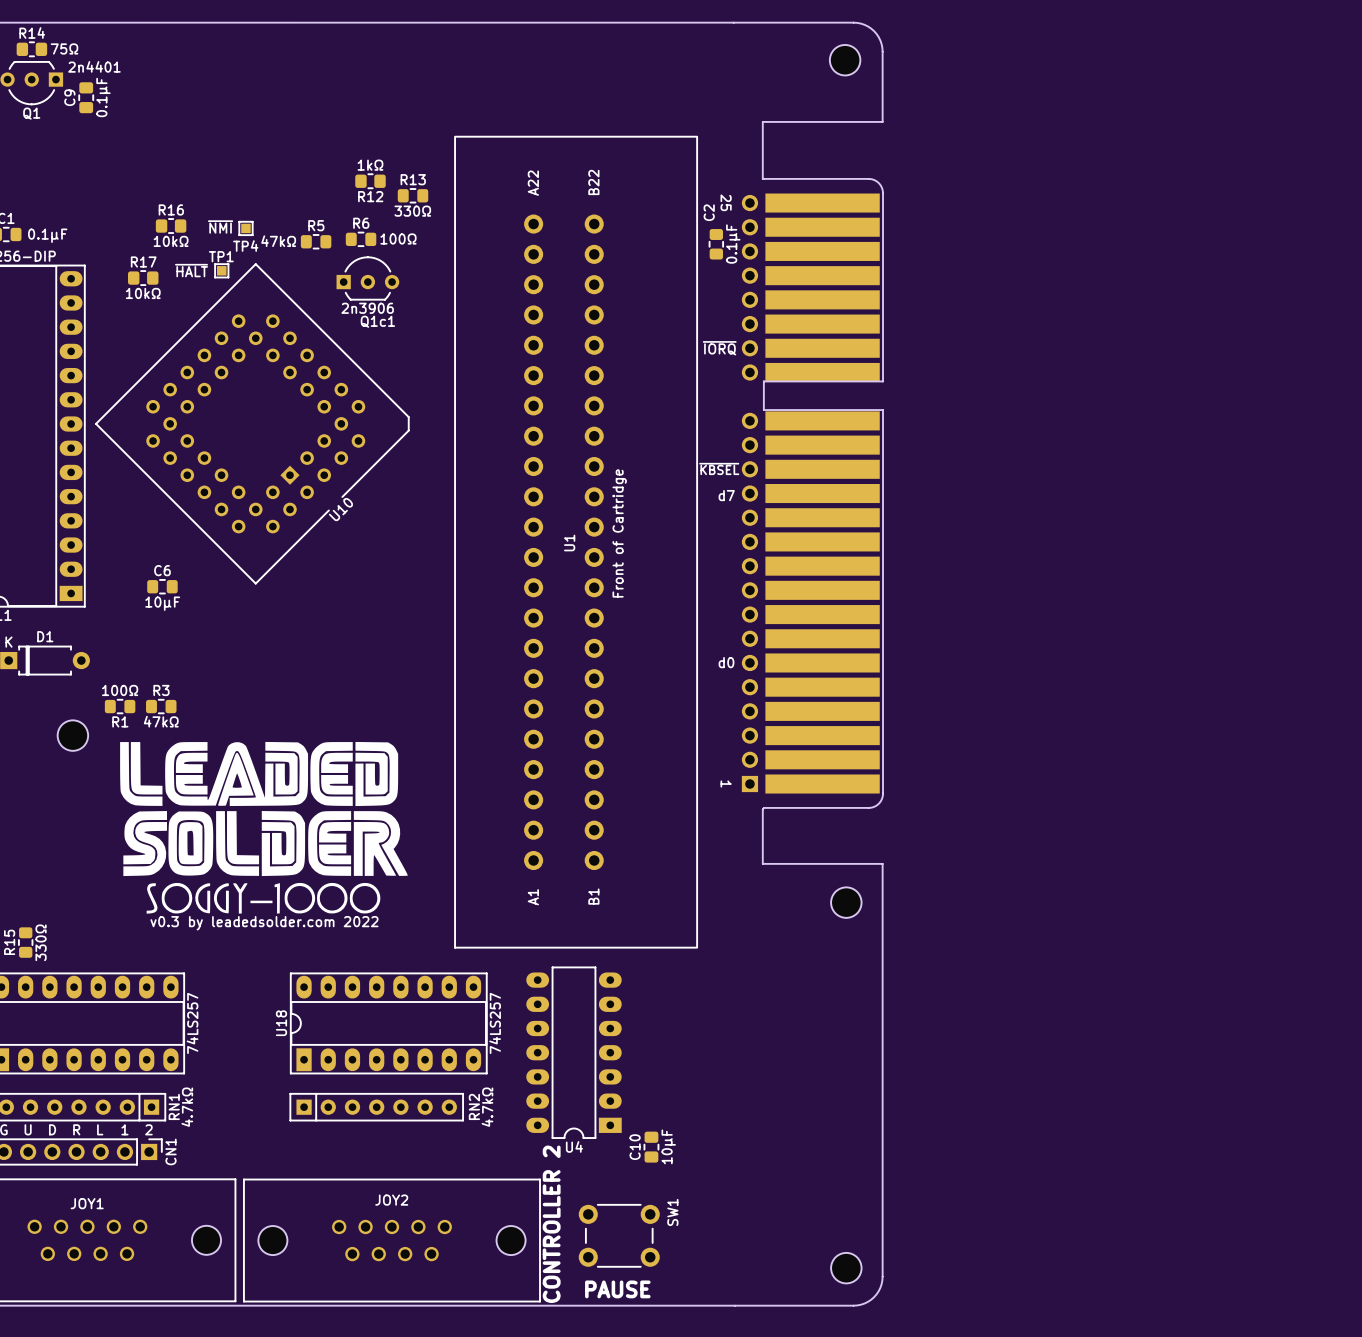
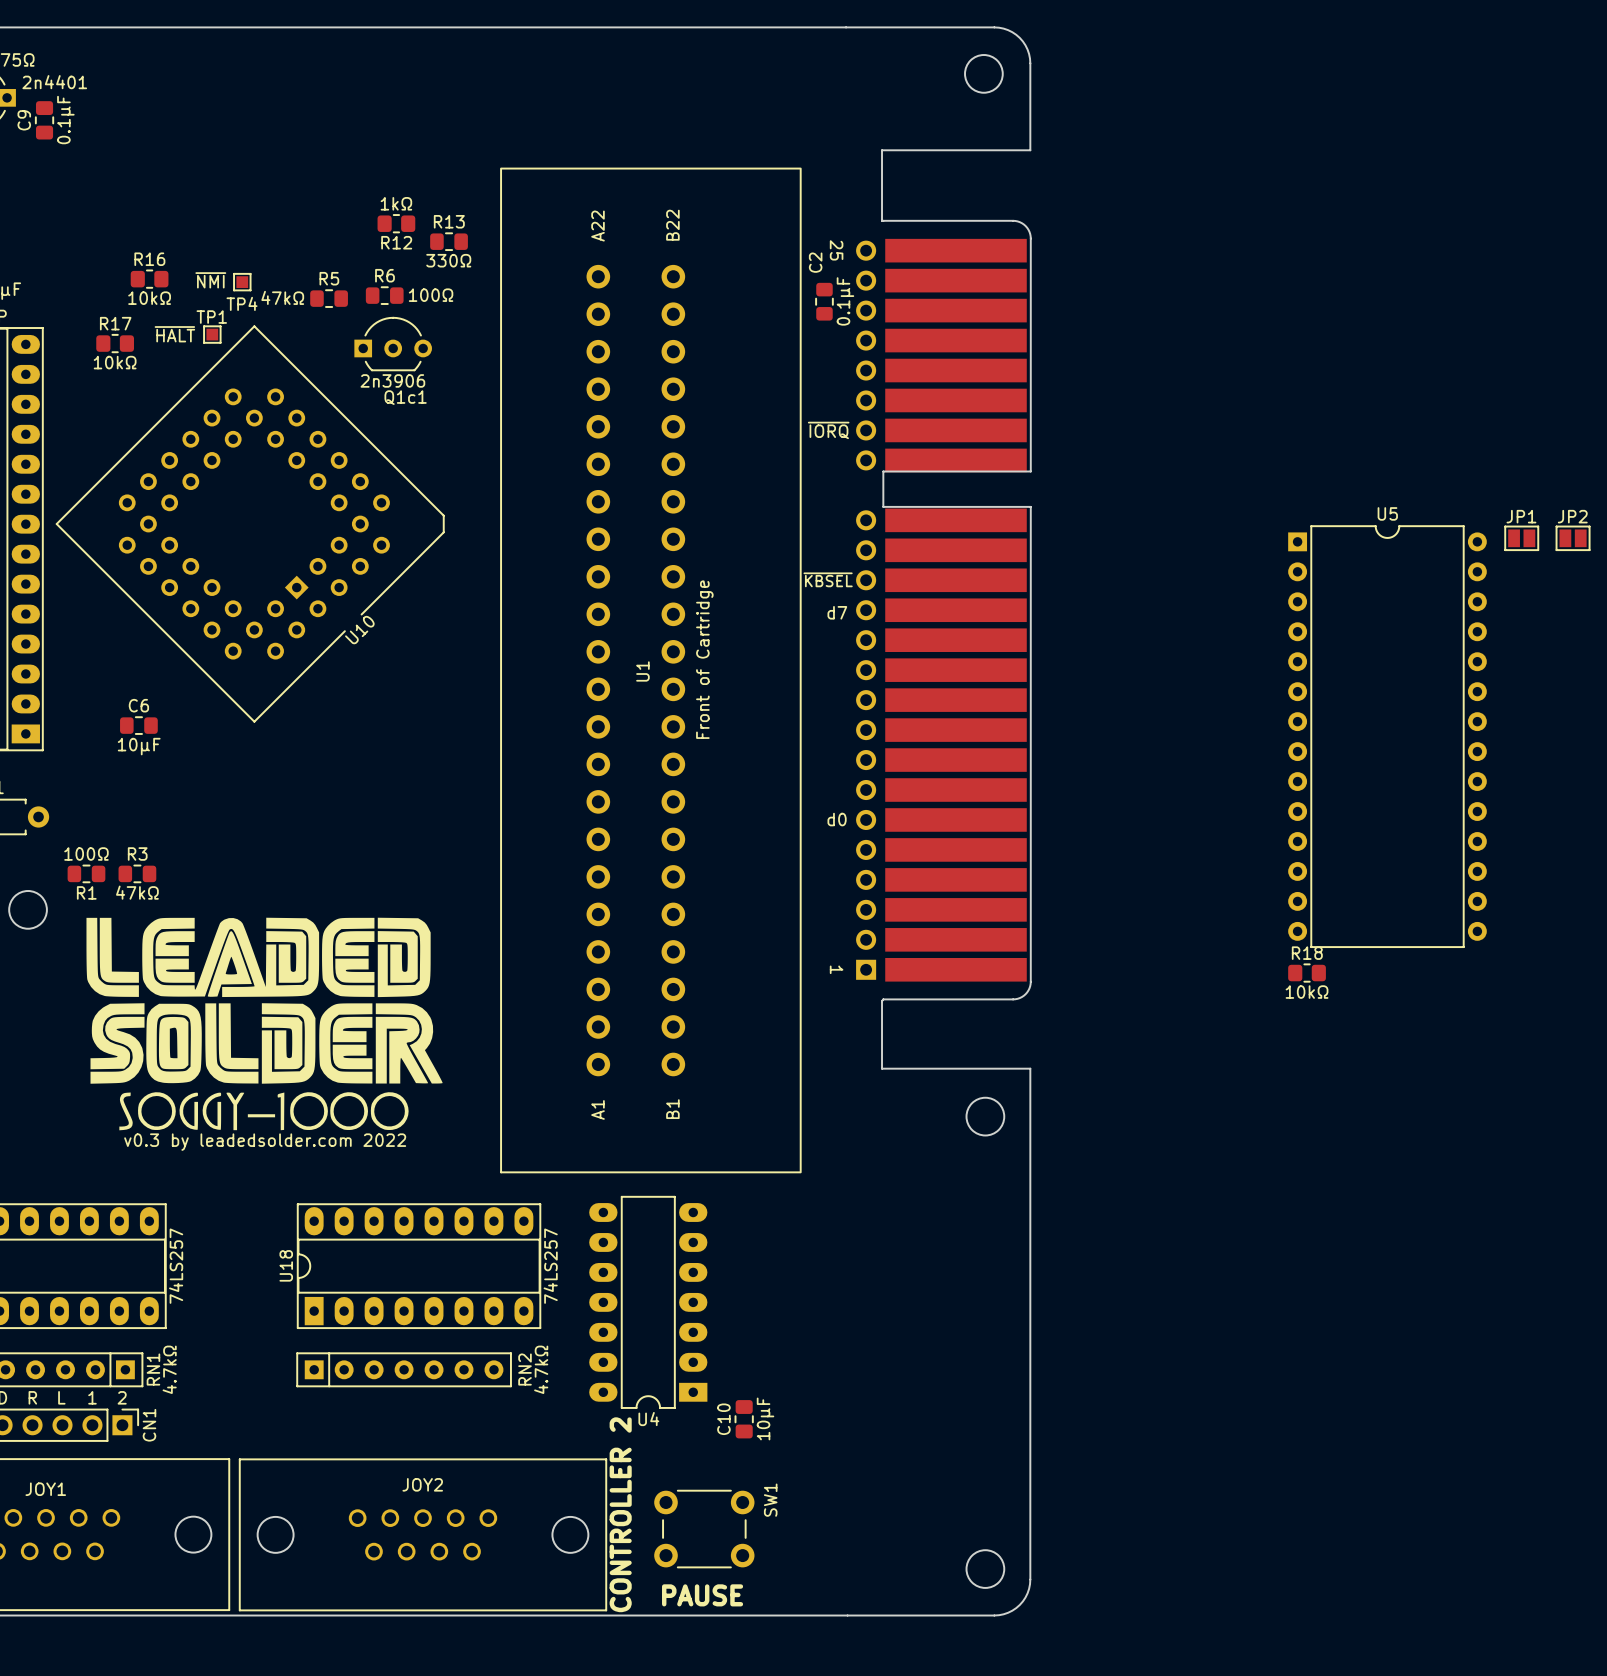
JP1: none -> (1521, 538)
JP2: none -> (1573, 538)
U5: none -> (1387, 736)
R18: none -> 10kΩ (1307, 973)

